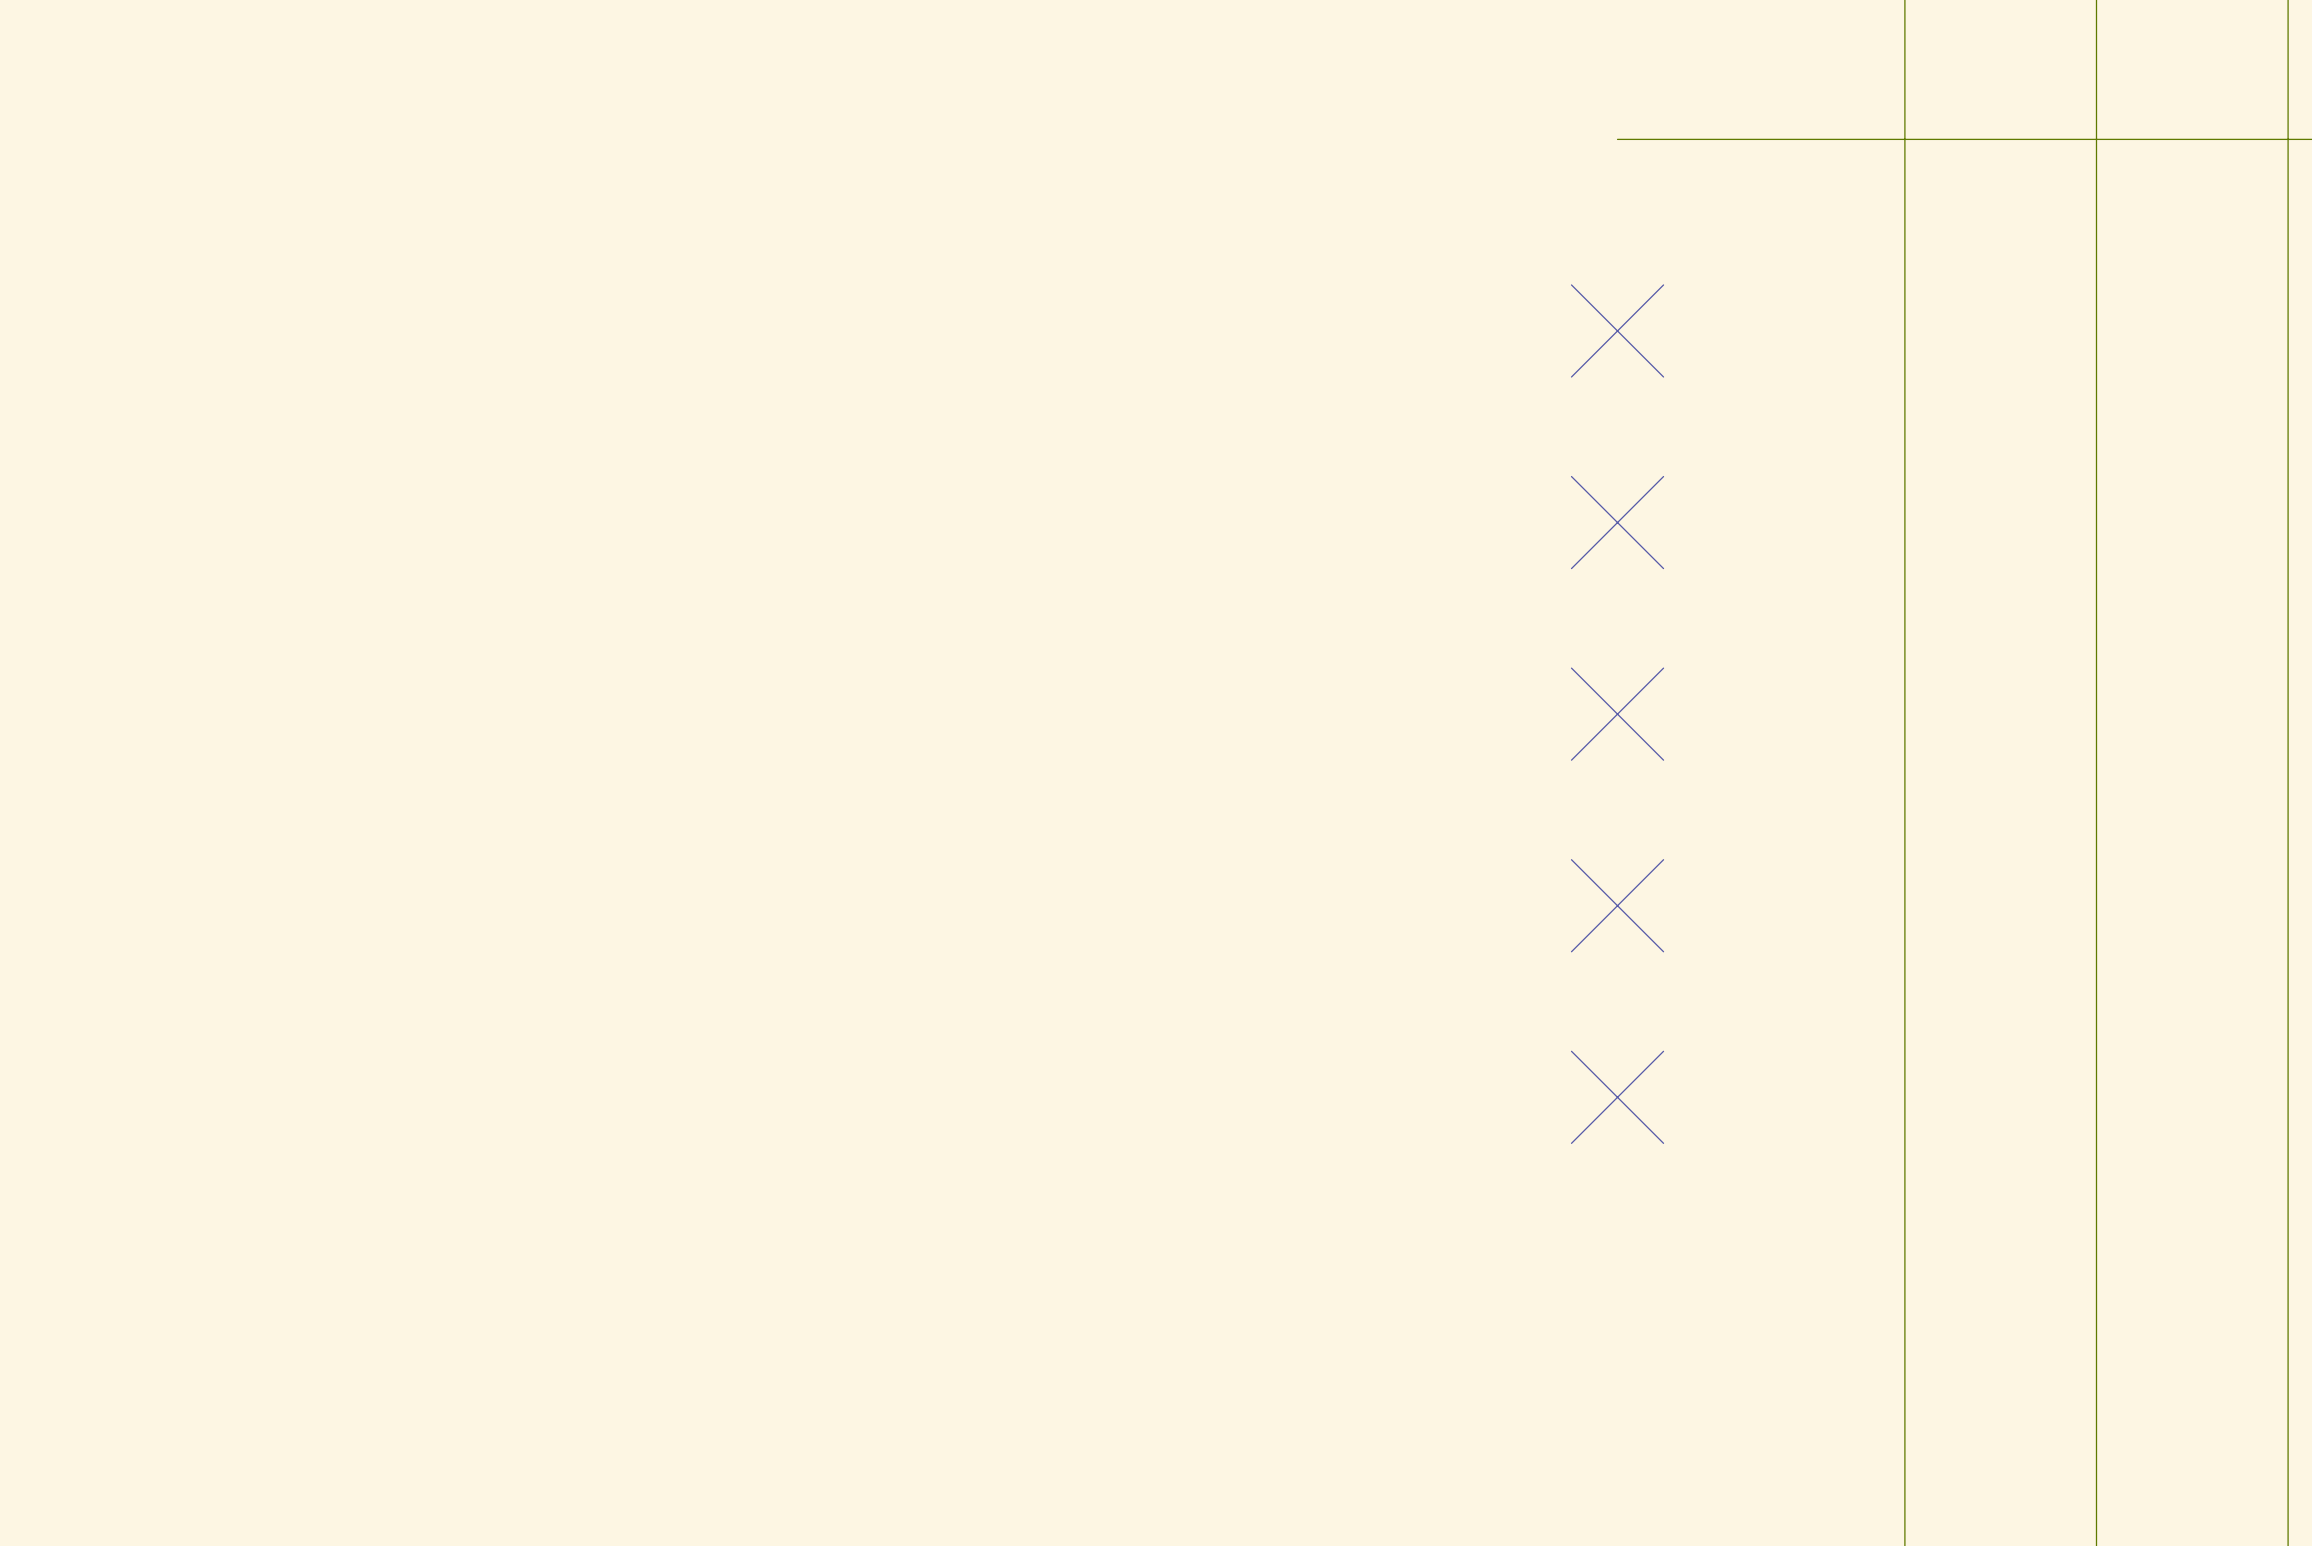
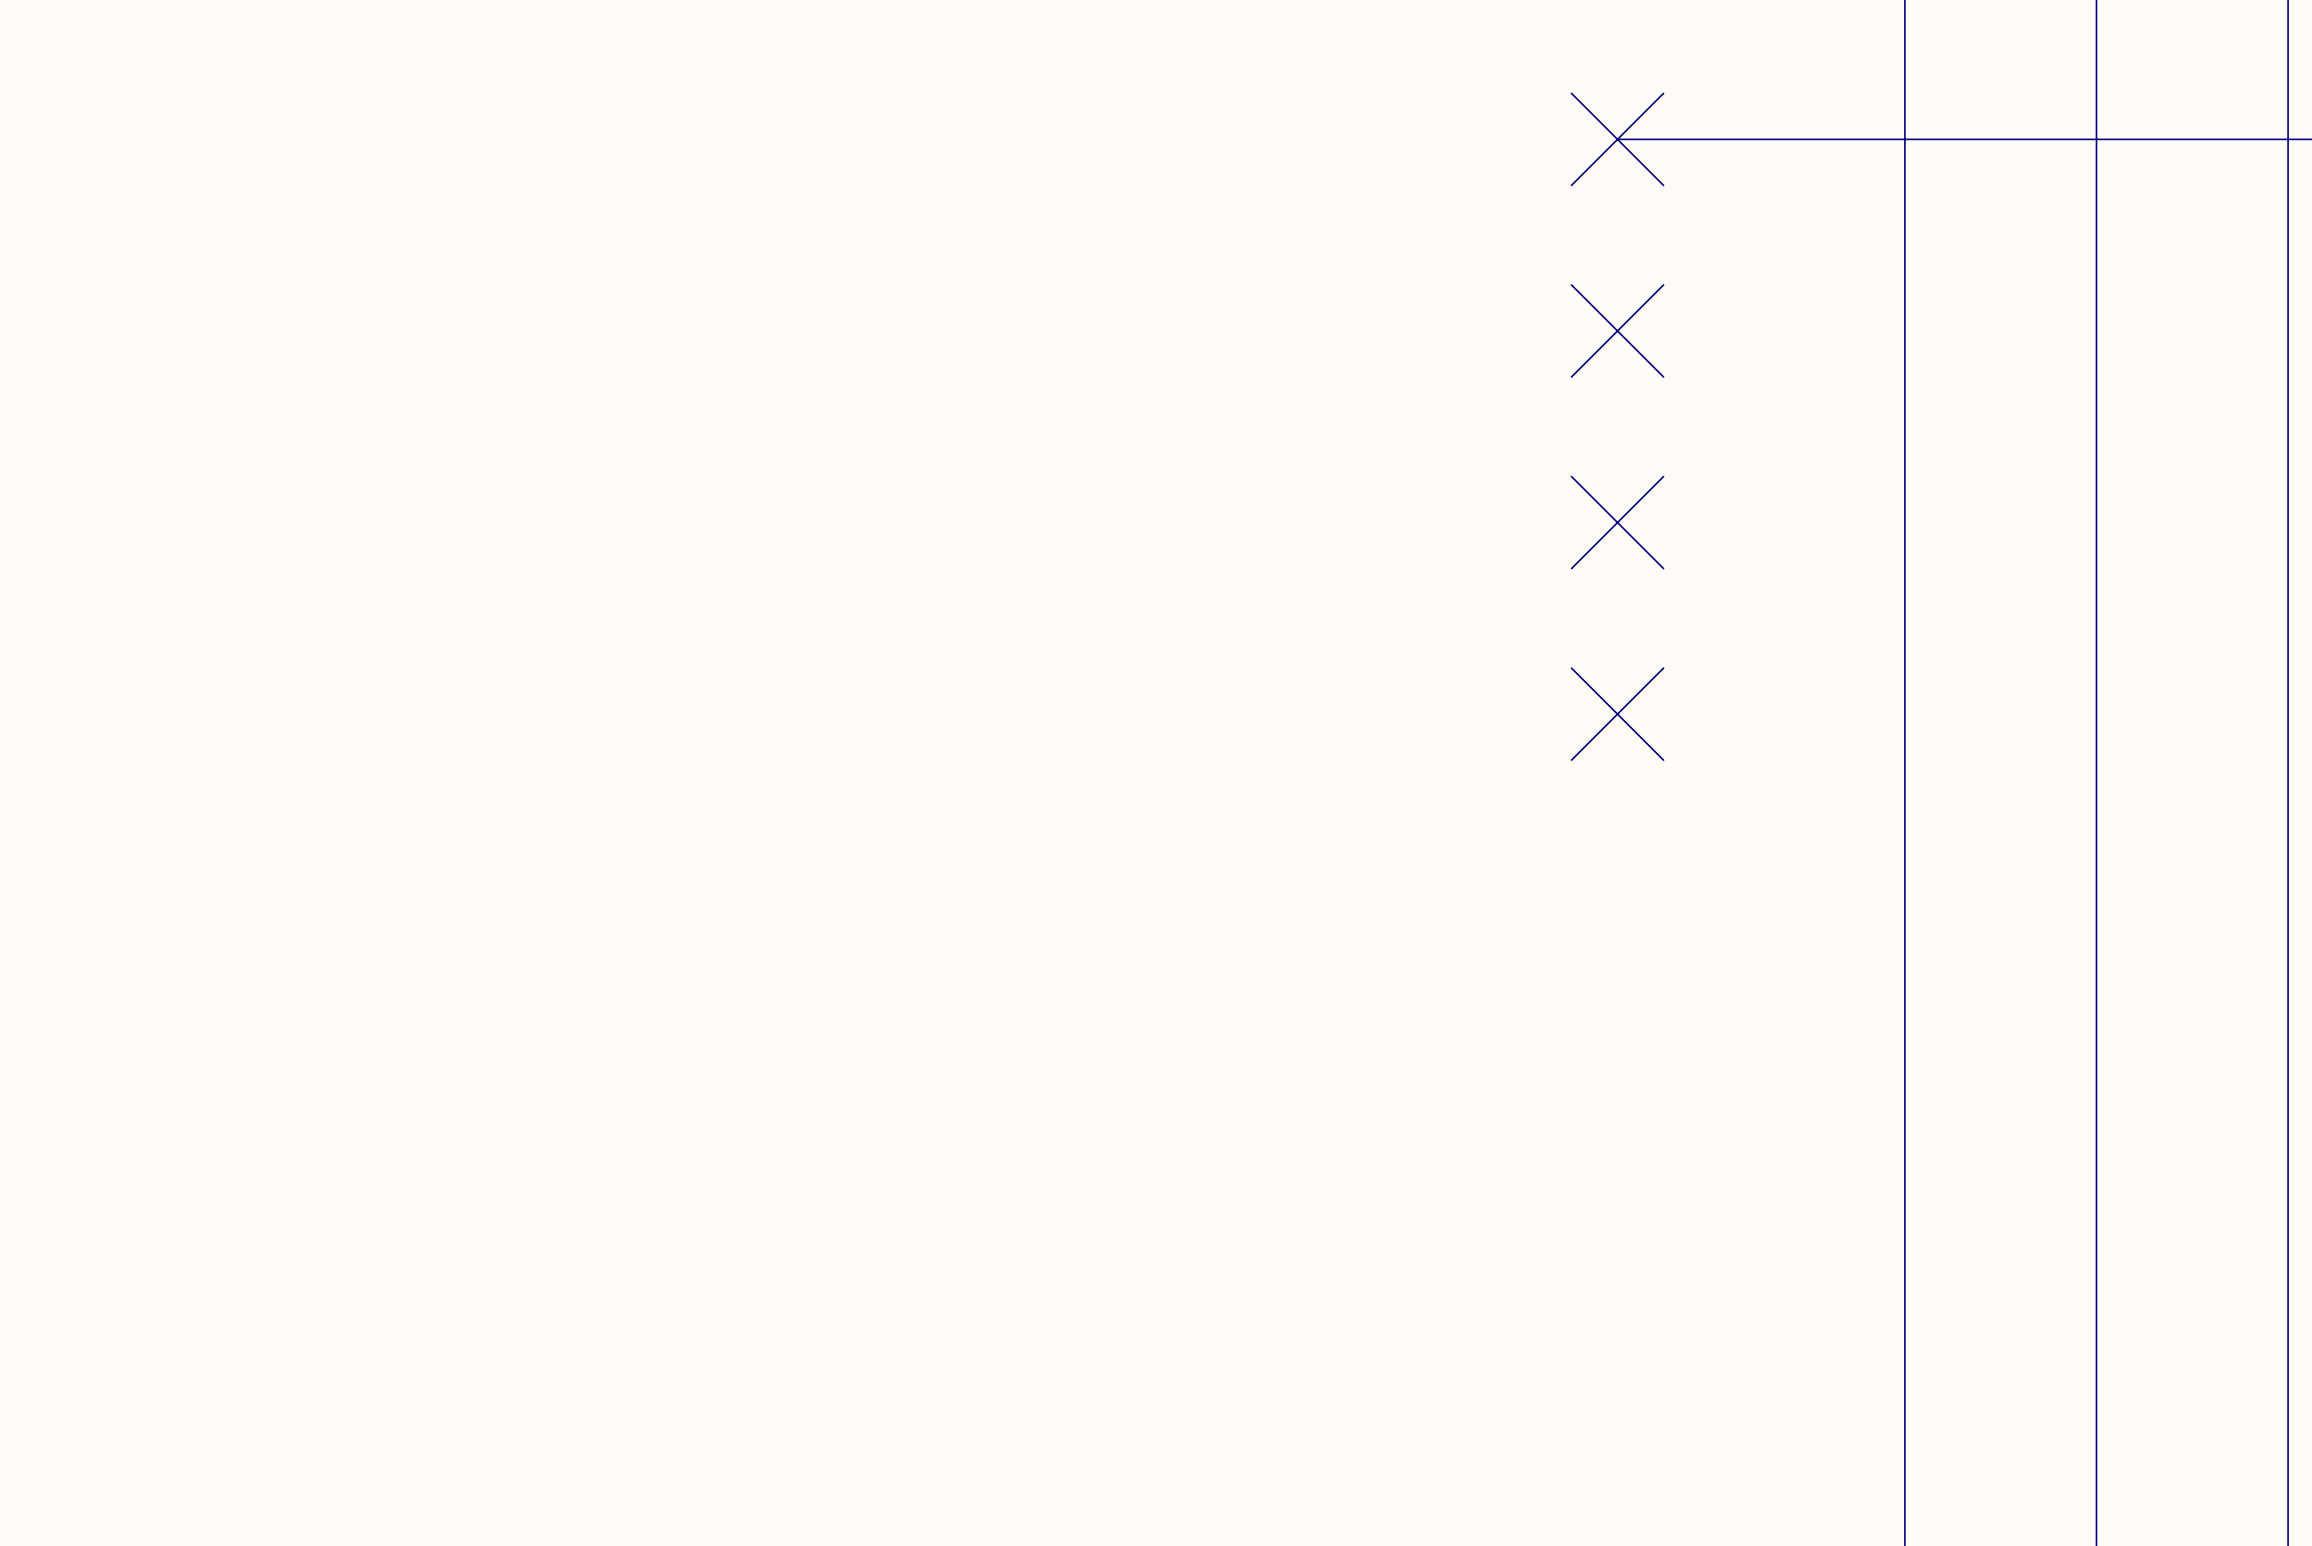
no-connect mark: none -> (1617, 139)
no-connect mark: (1617, 905) -> none
no-connect mark: (1617, 1097) -> none

